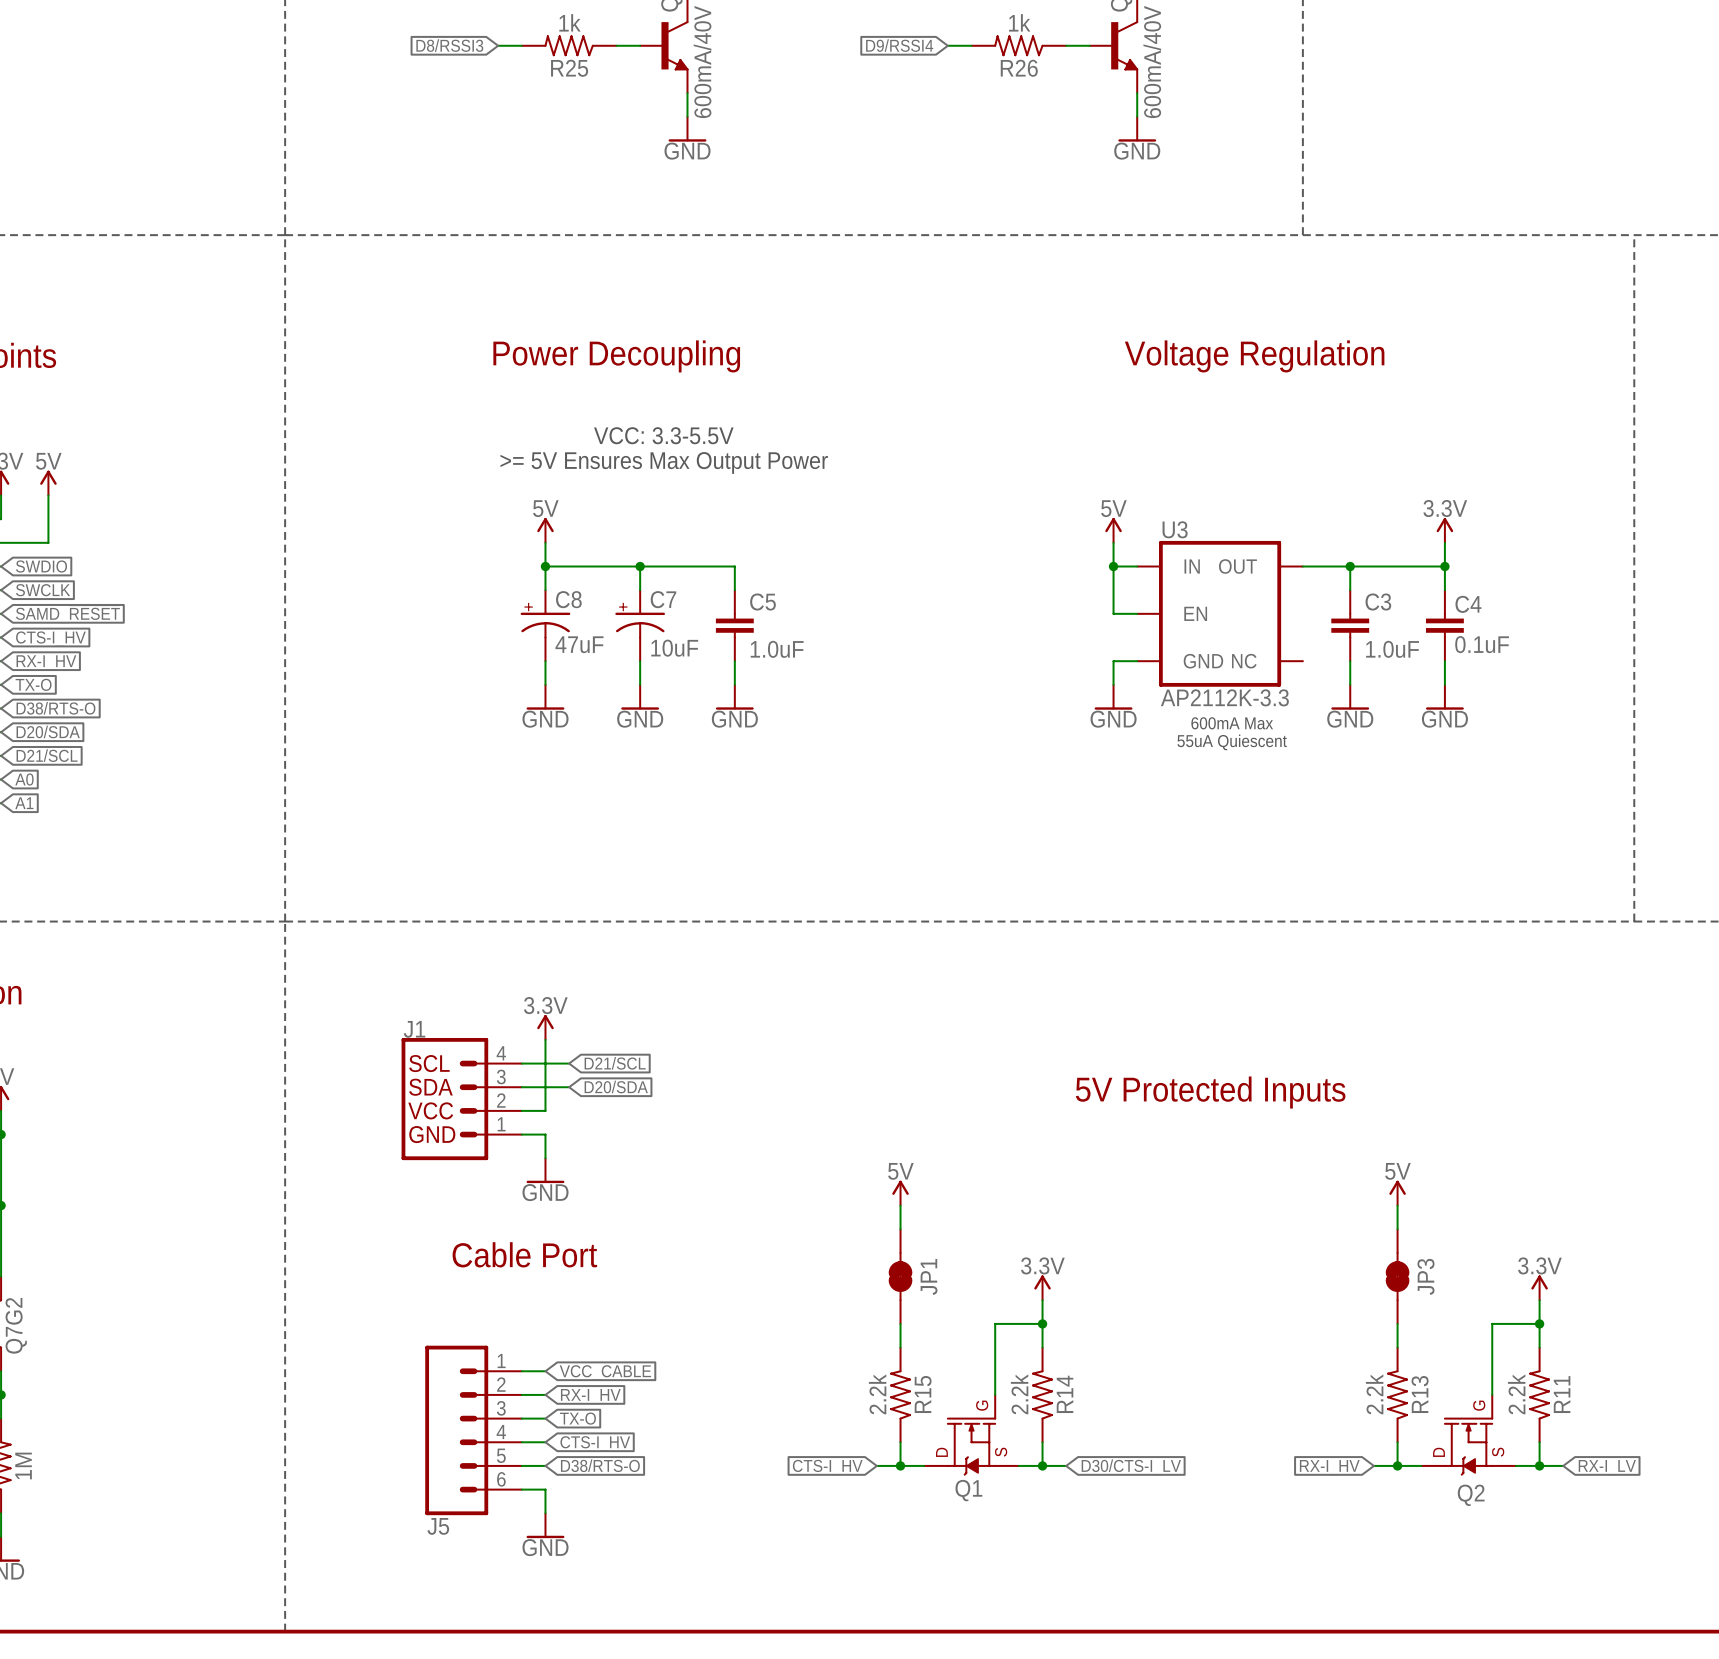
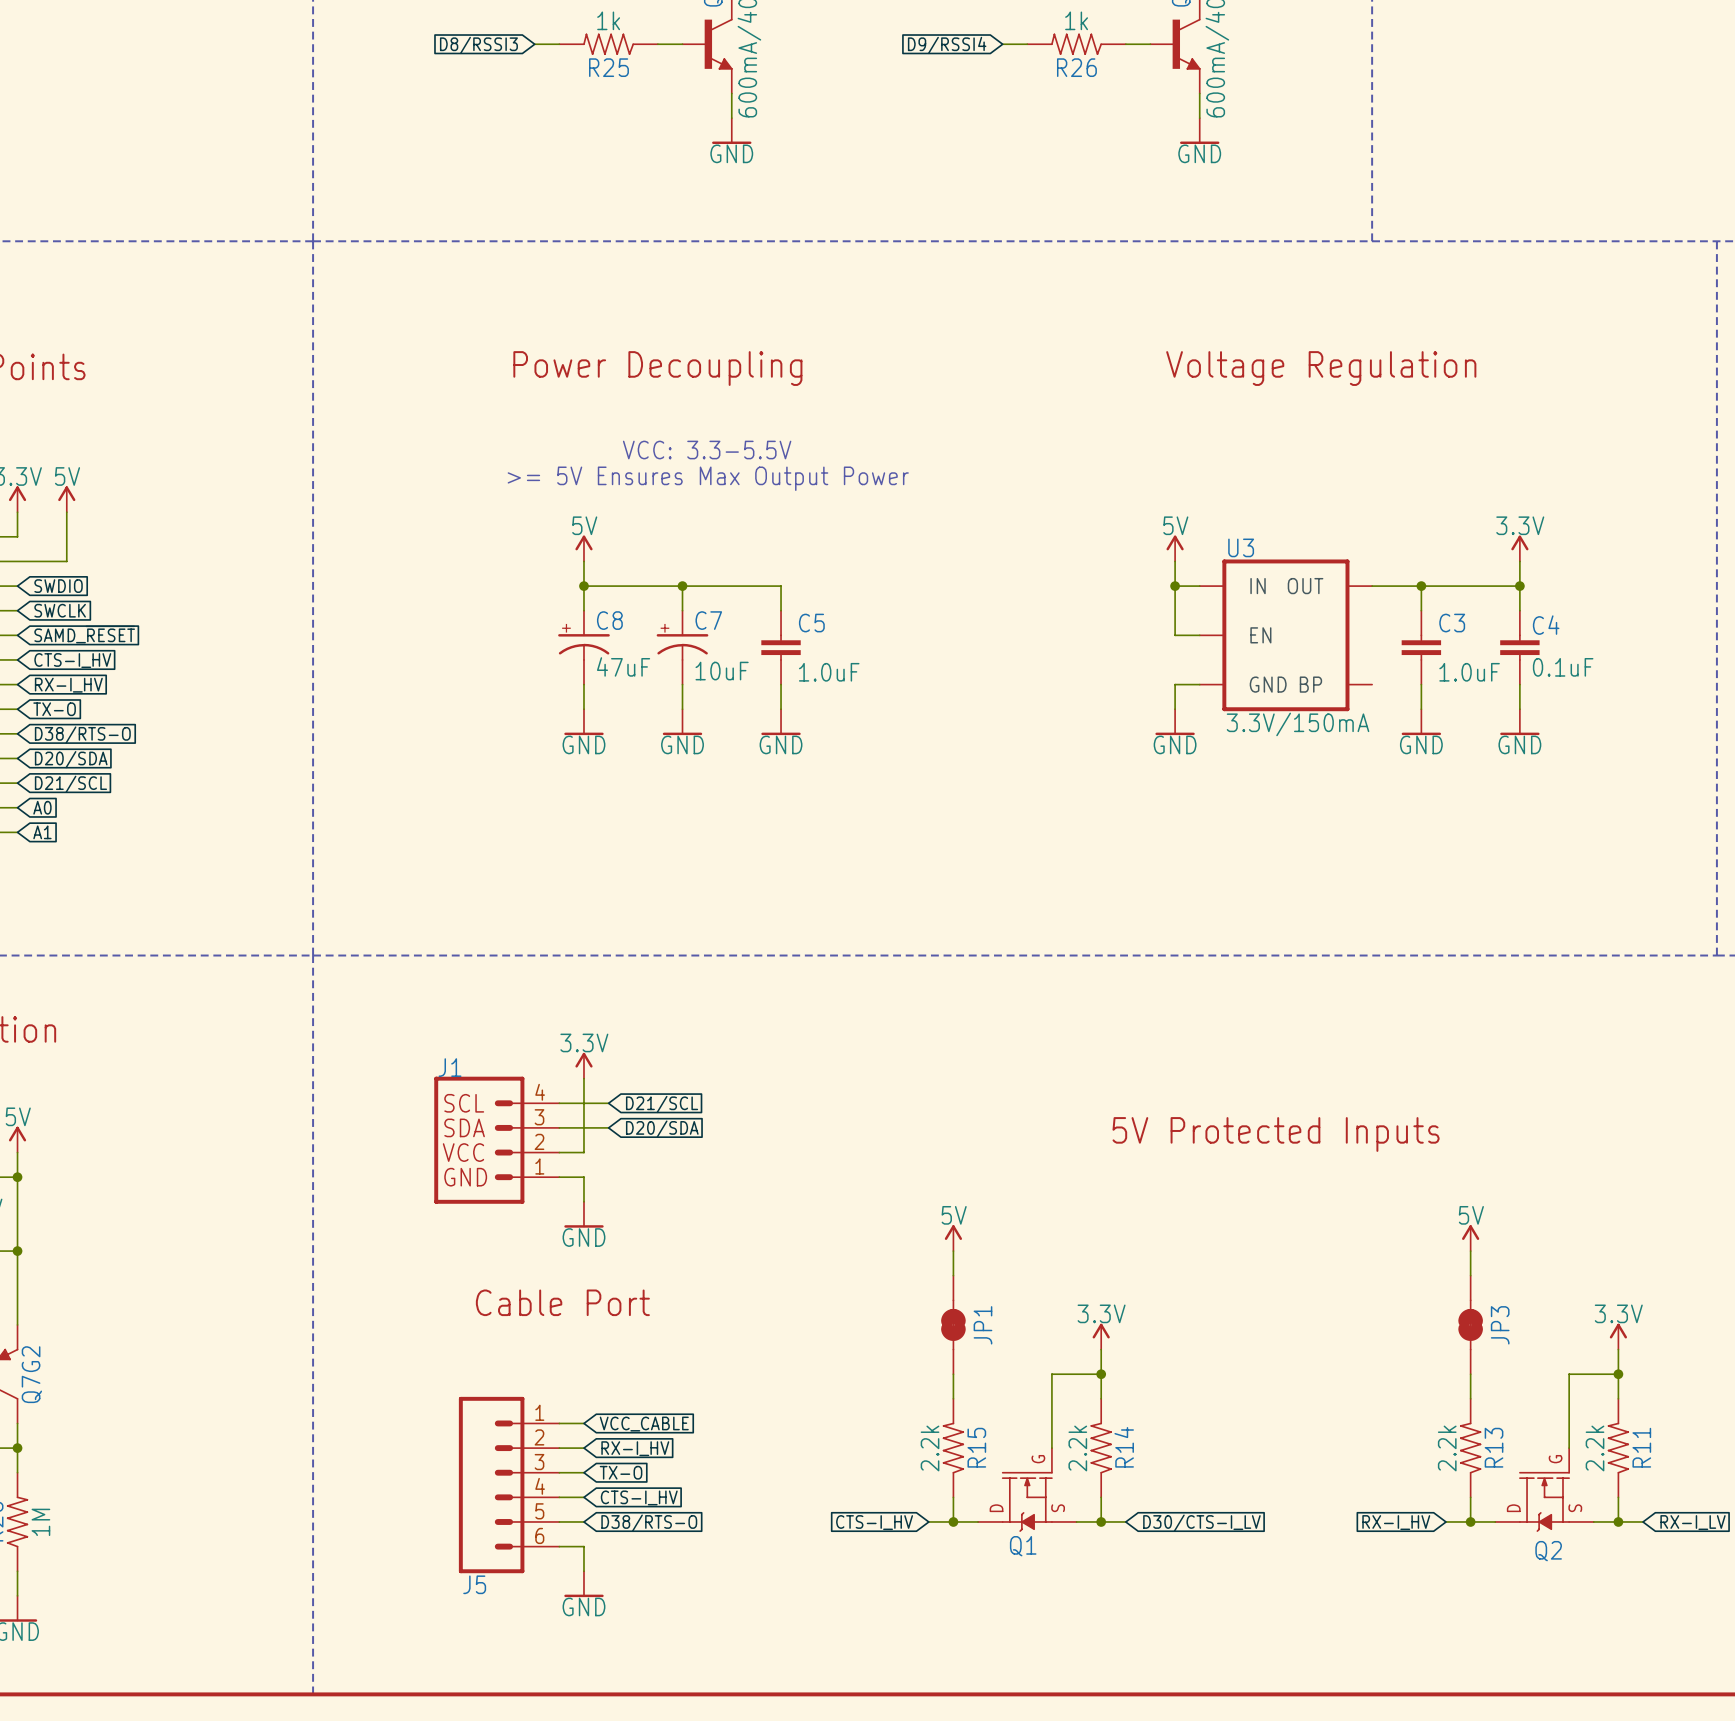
U3 pin name: NC (1244, 661) -> BP (1310, 684)
U3 value: AP2112K-3.3 (1224, 697) -> 3.3V/150mA (1298, 724)
text: 600mA Max (1232, 723) -> none
text: 55uA Quiescent (1232, 742) -> none

